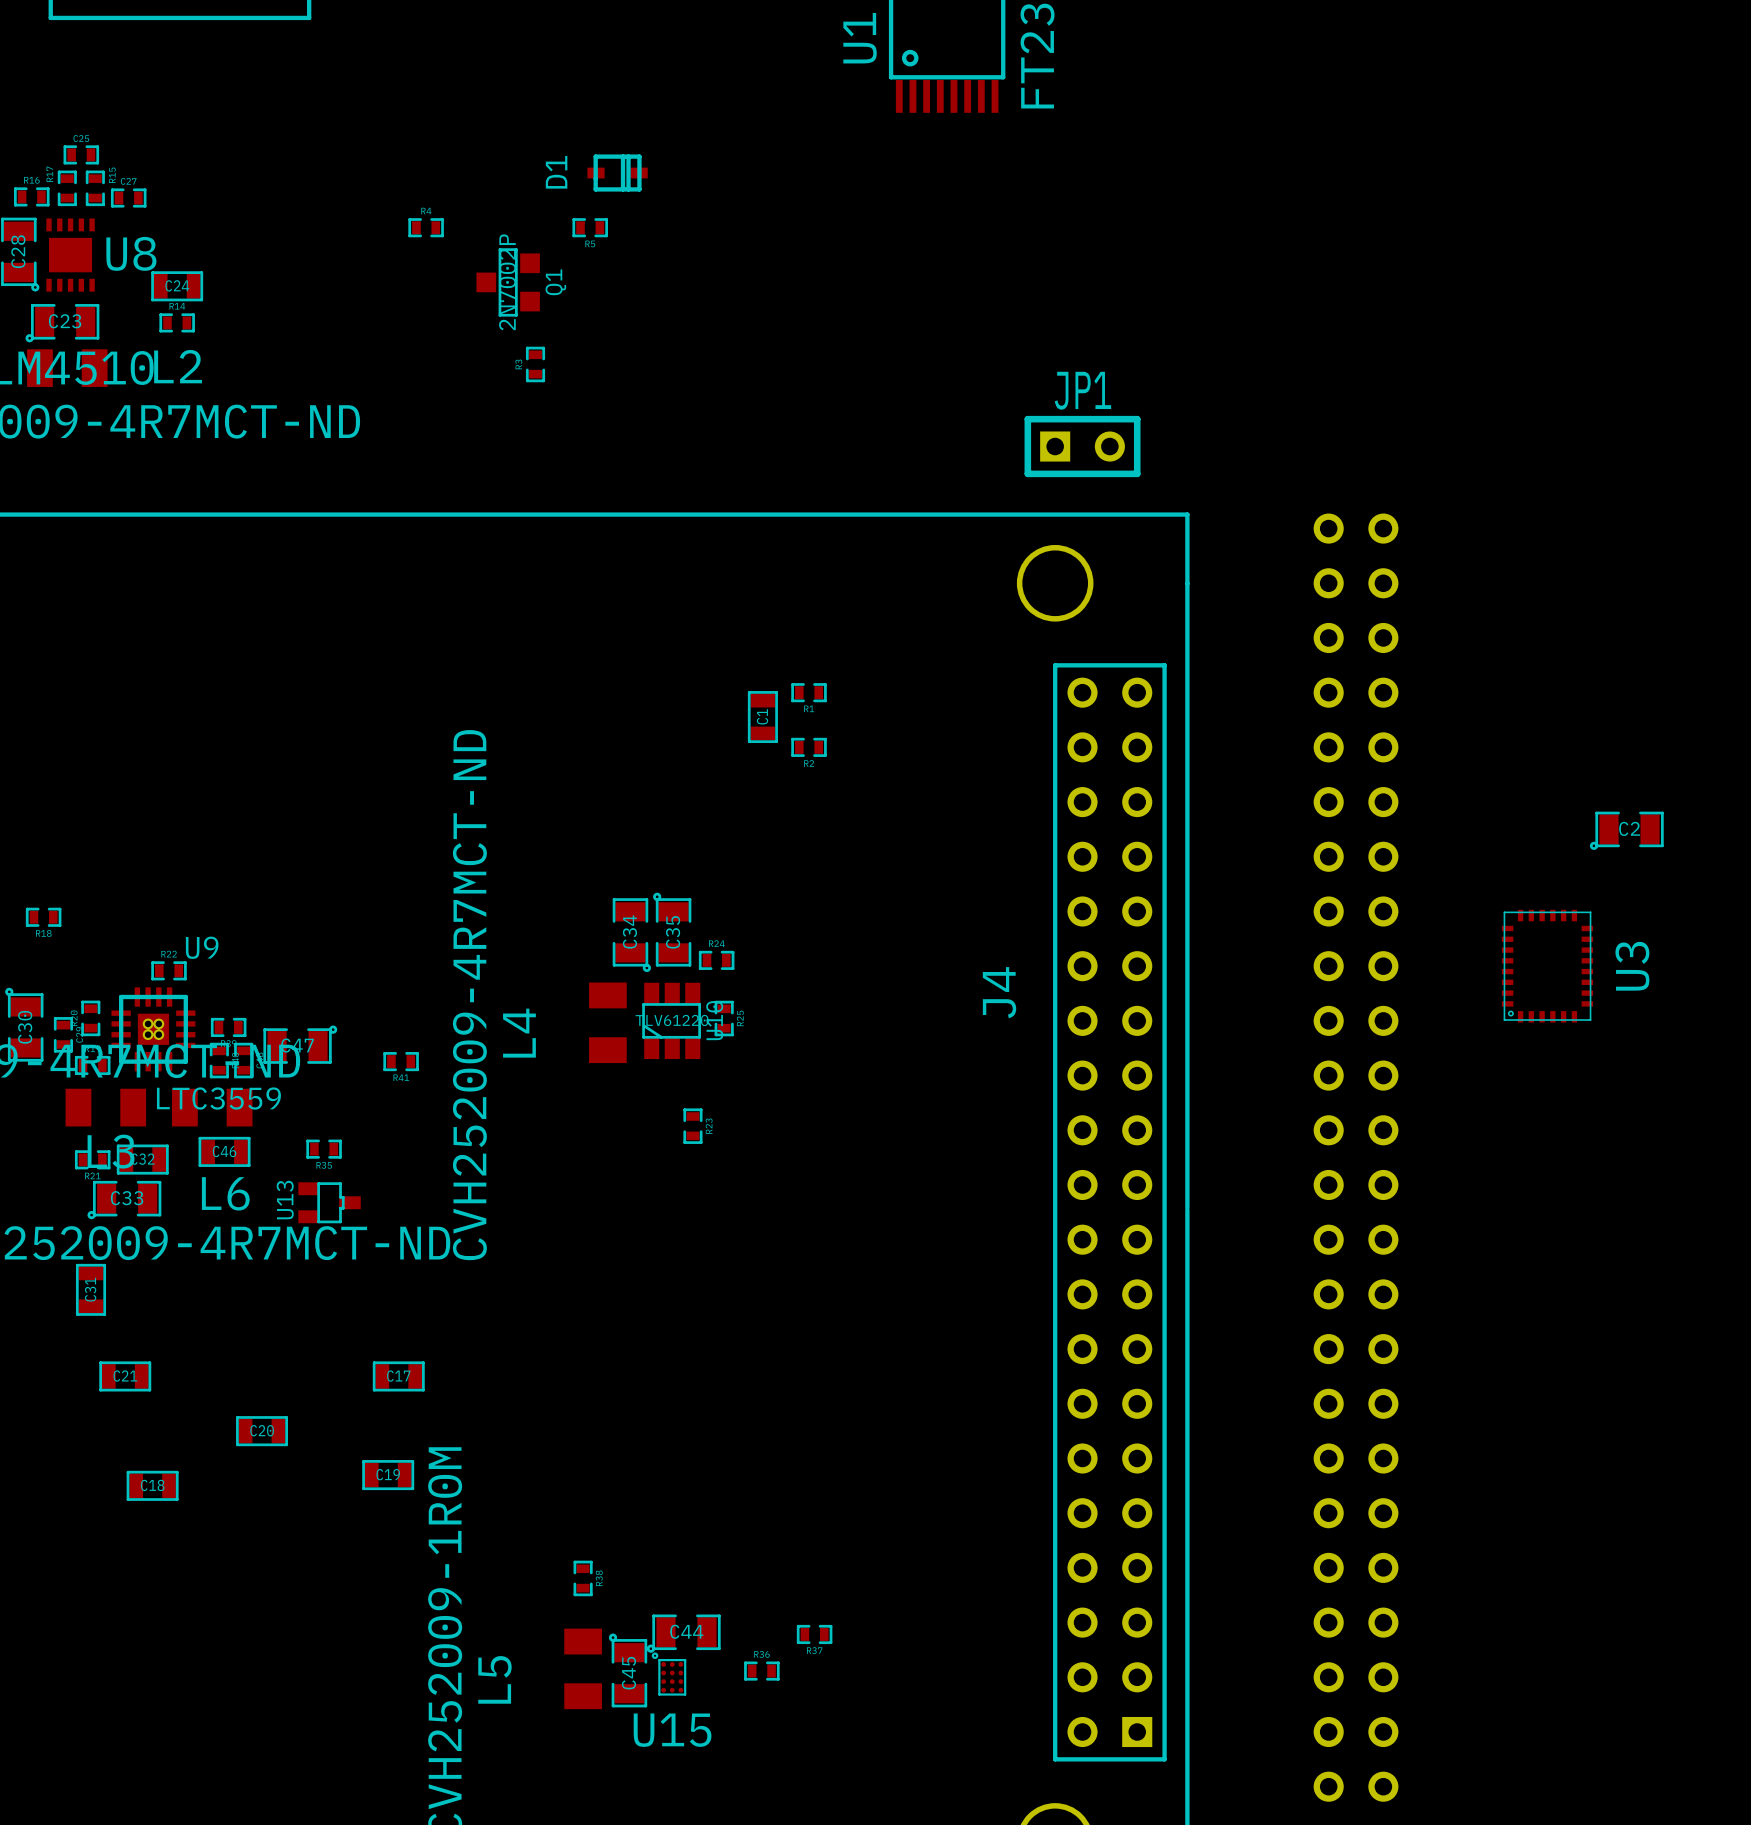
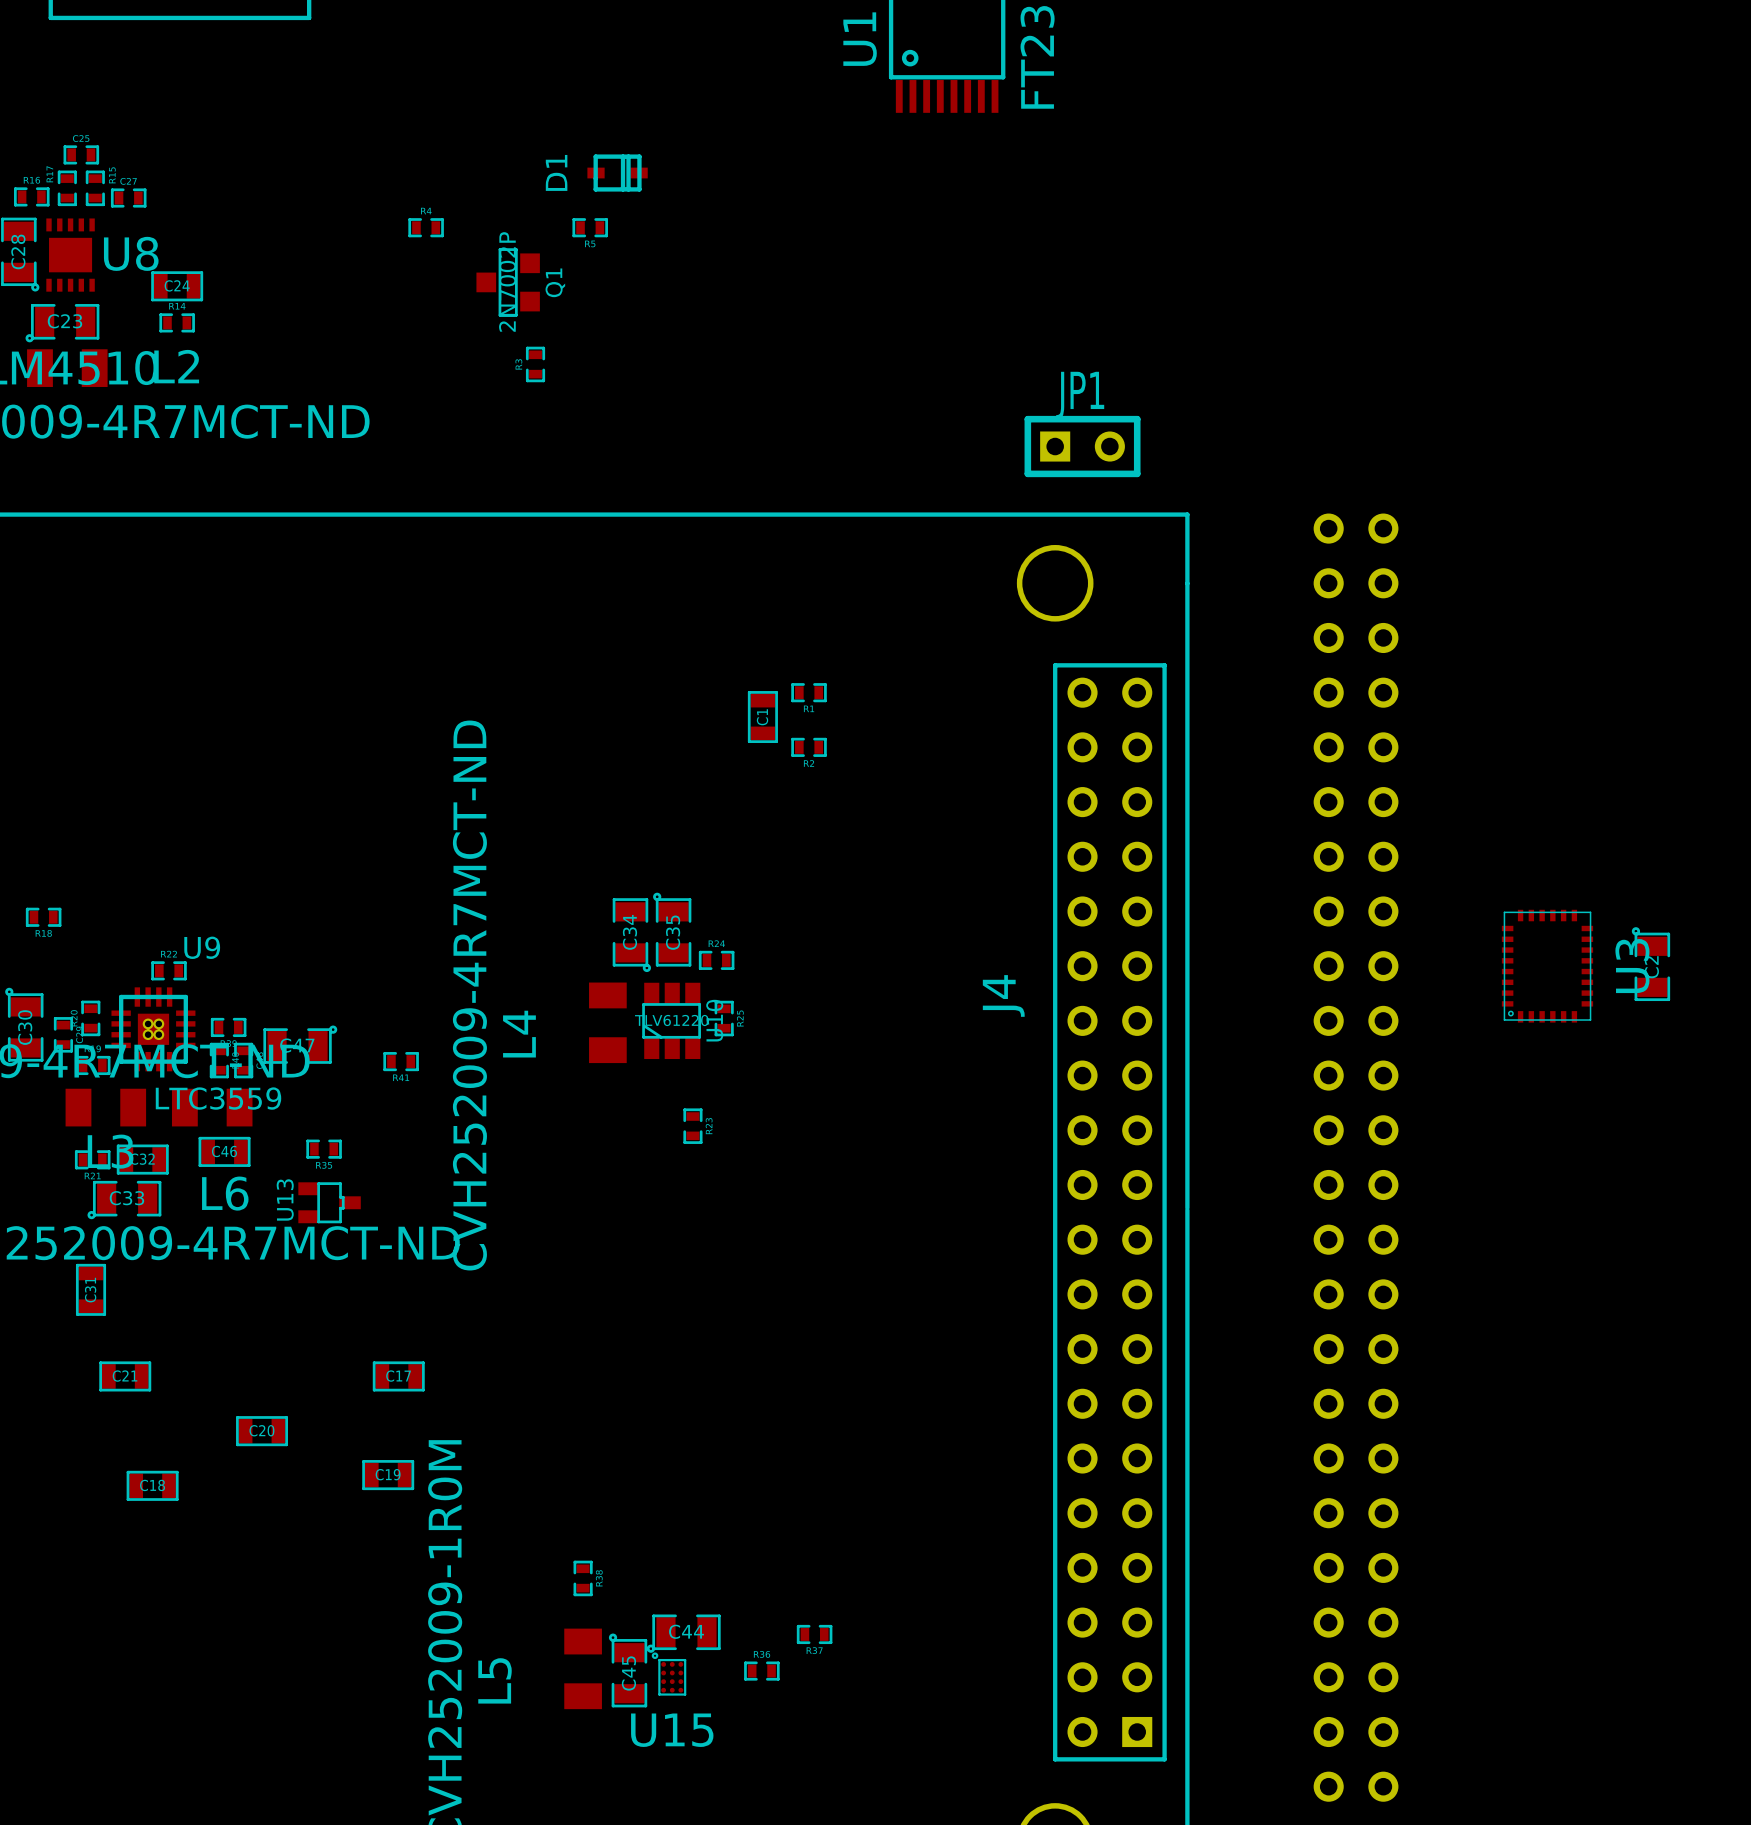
C2 rotation: 0° (1626, 830) -> 90° clockwise (1650, 964)
C2 position: (1626, 830) -> (1650, 964)

